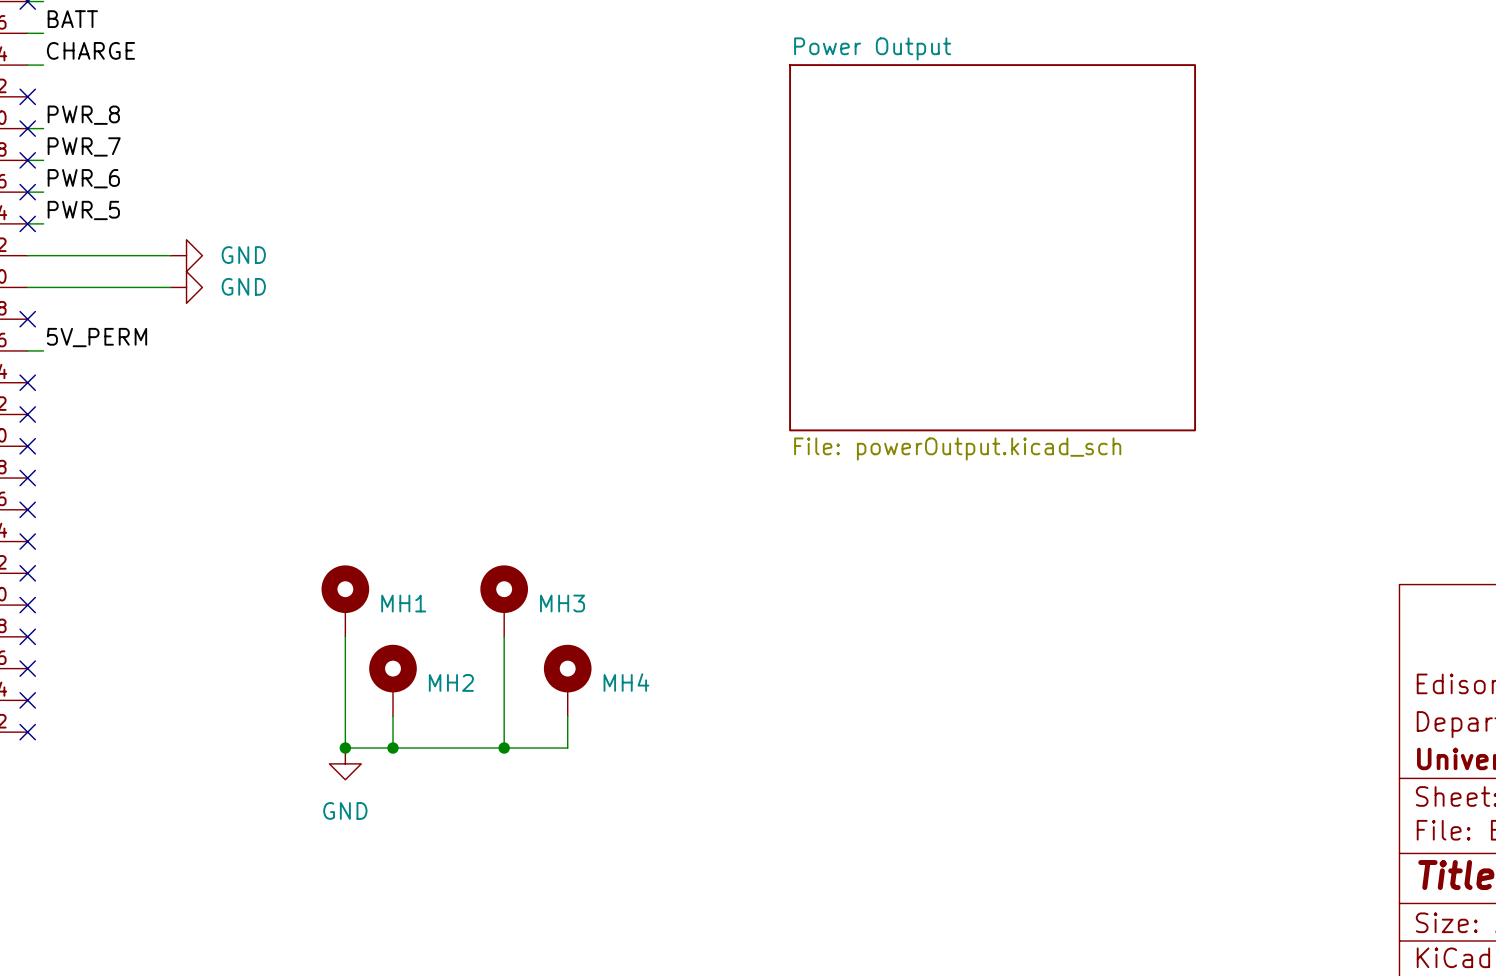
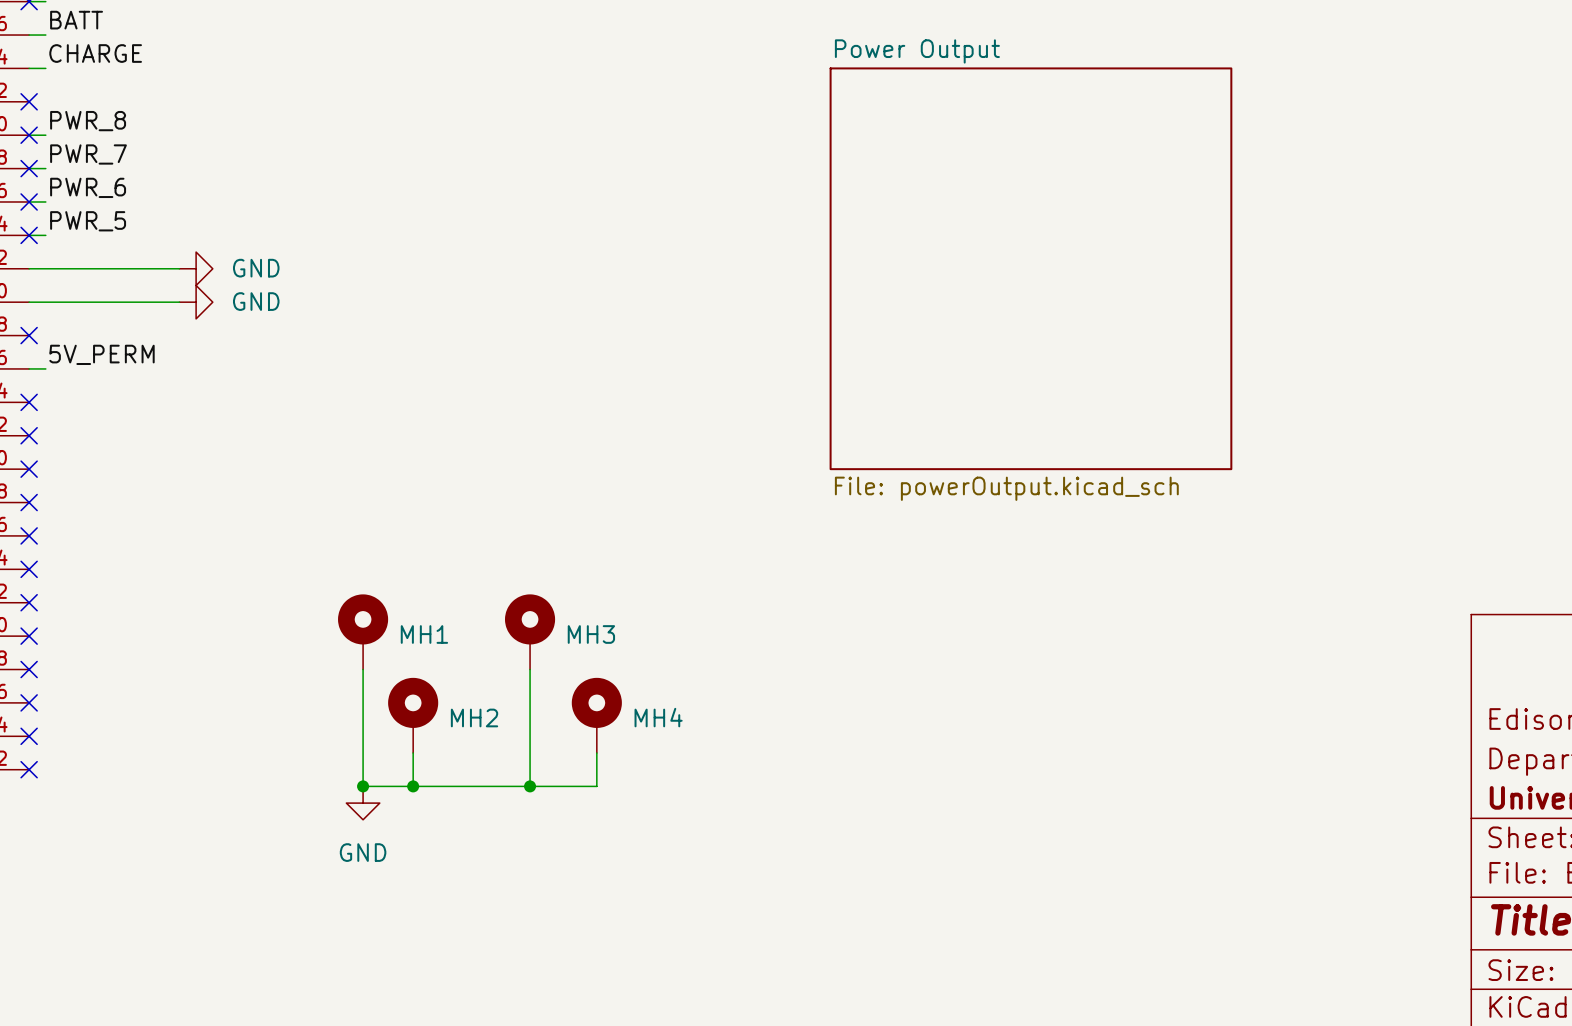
sheet Power Output: File: powerOutput.kicad_sch (992, 247) -> none
sheet Power Output: none -> File: powerOutput.kicad_sch (1030, 268)

